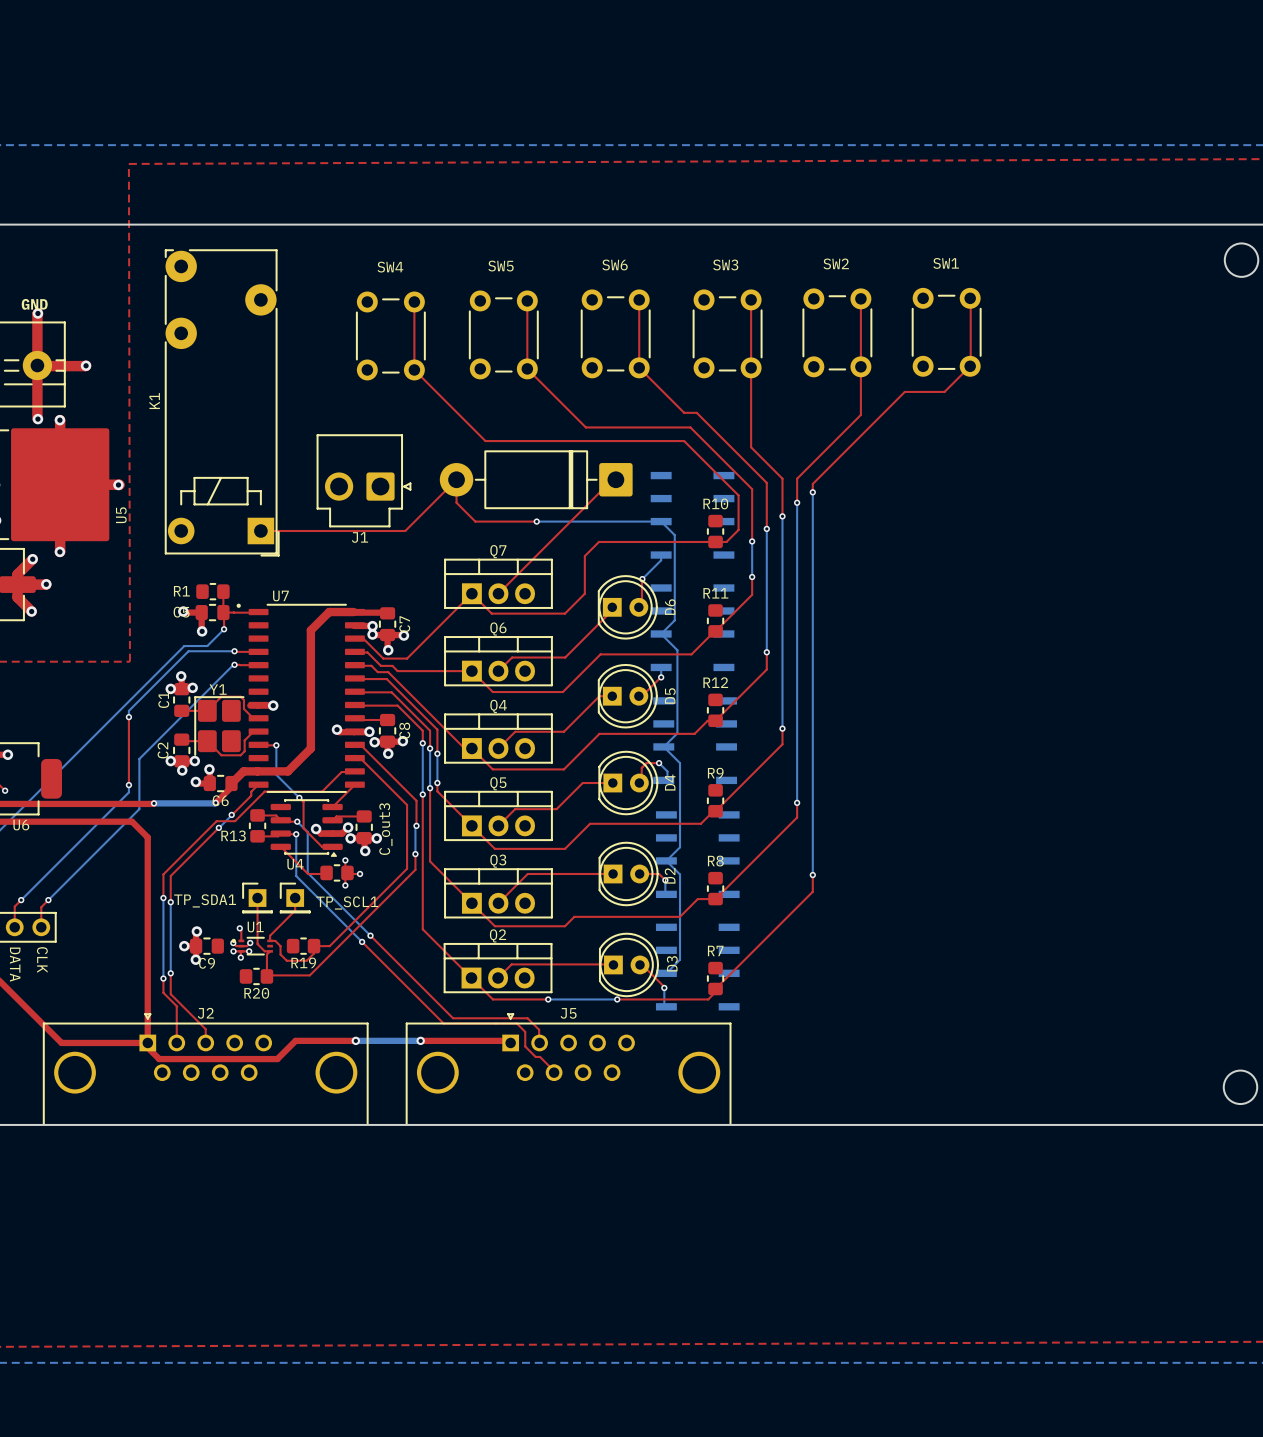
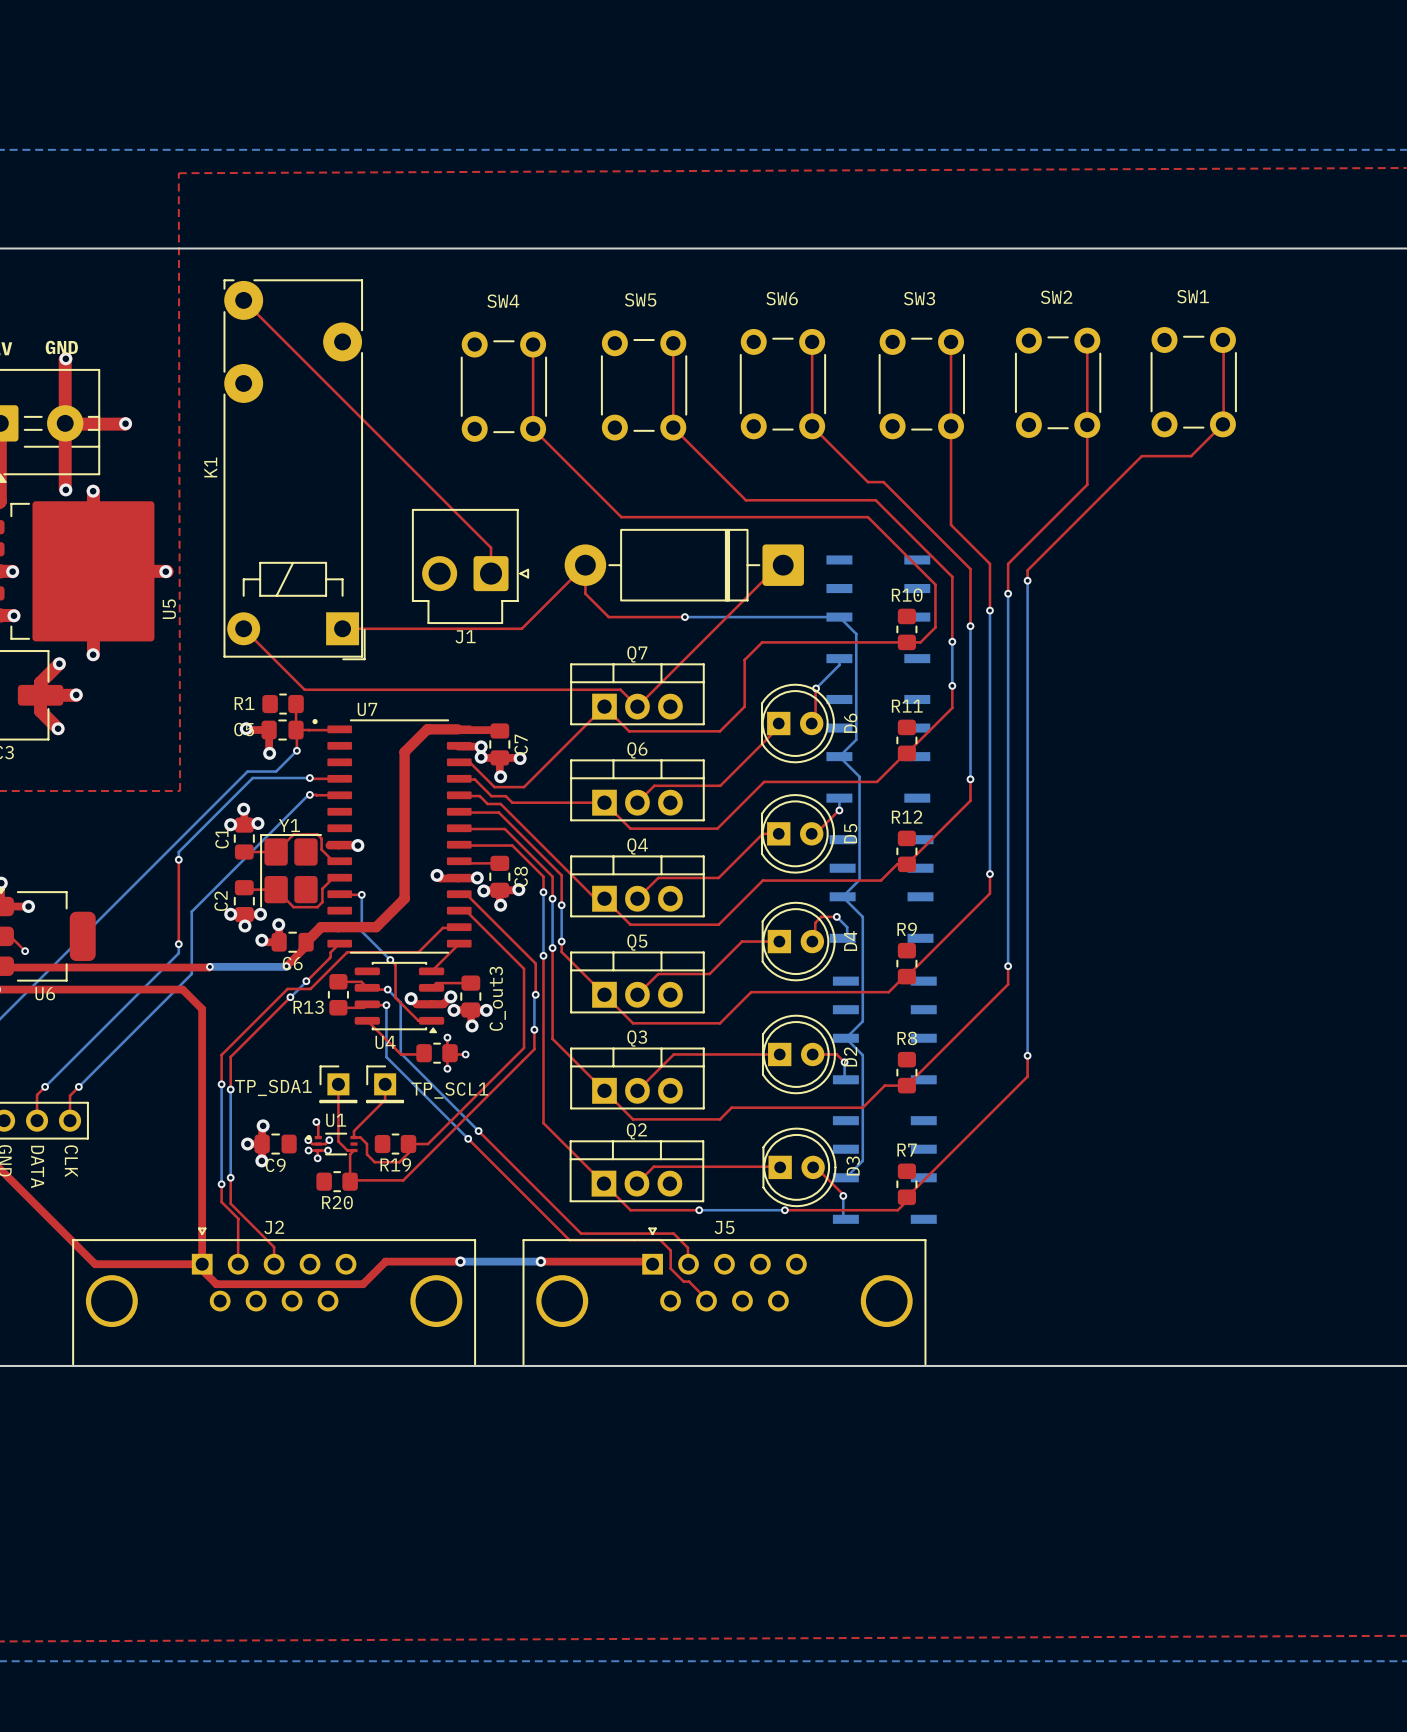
top track: none -> (243, 300) (491, 547) (491, 573)
top track: none -> (243, 628) (304, 689) (620, 689) (637, 706)

